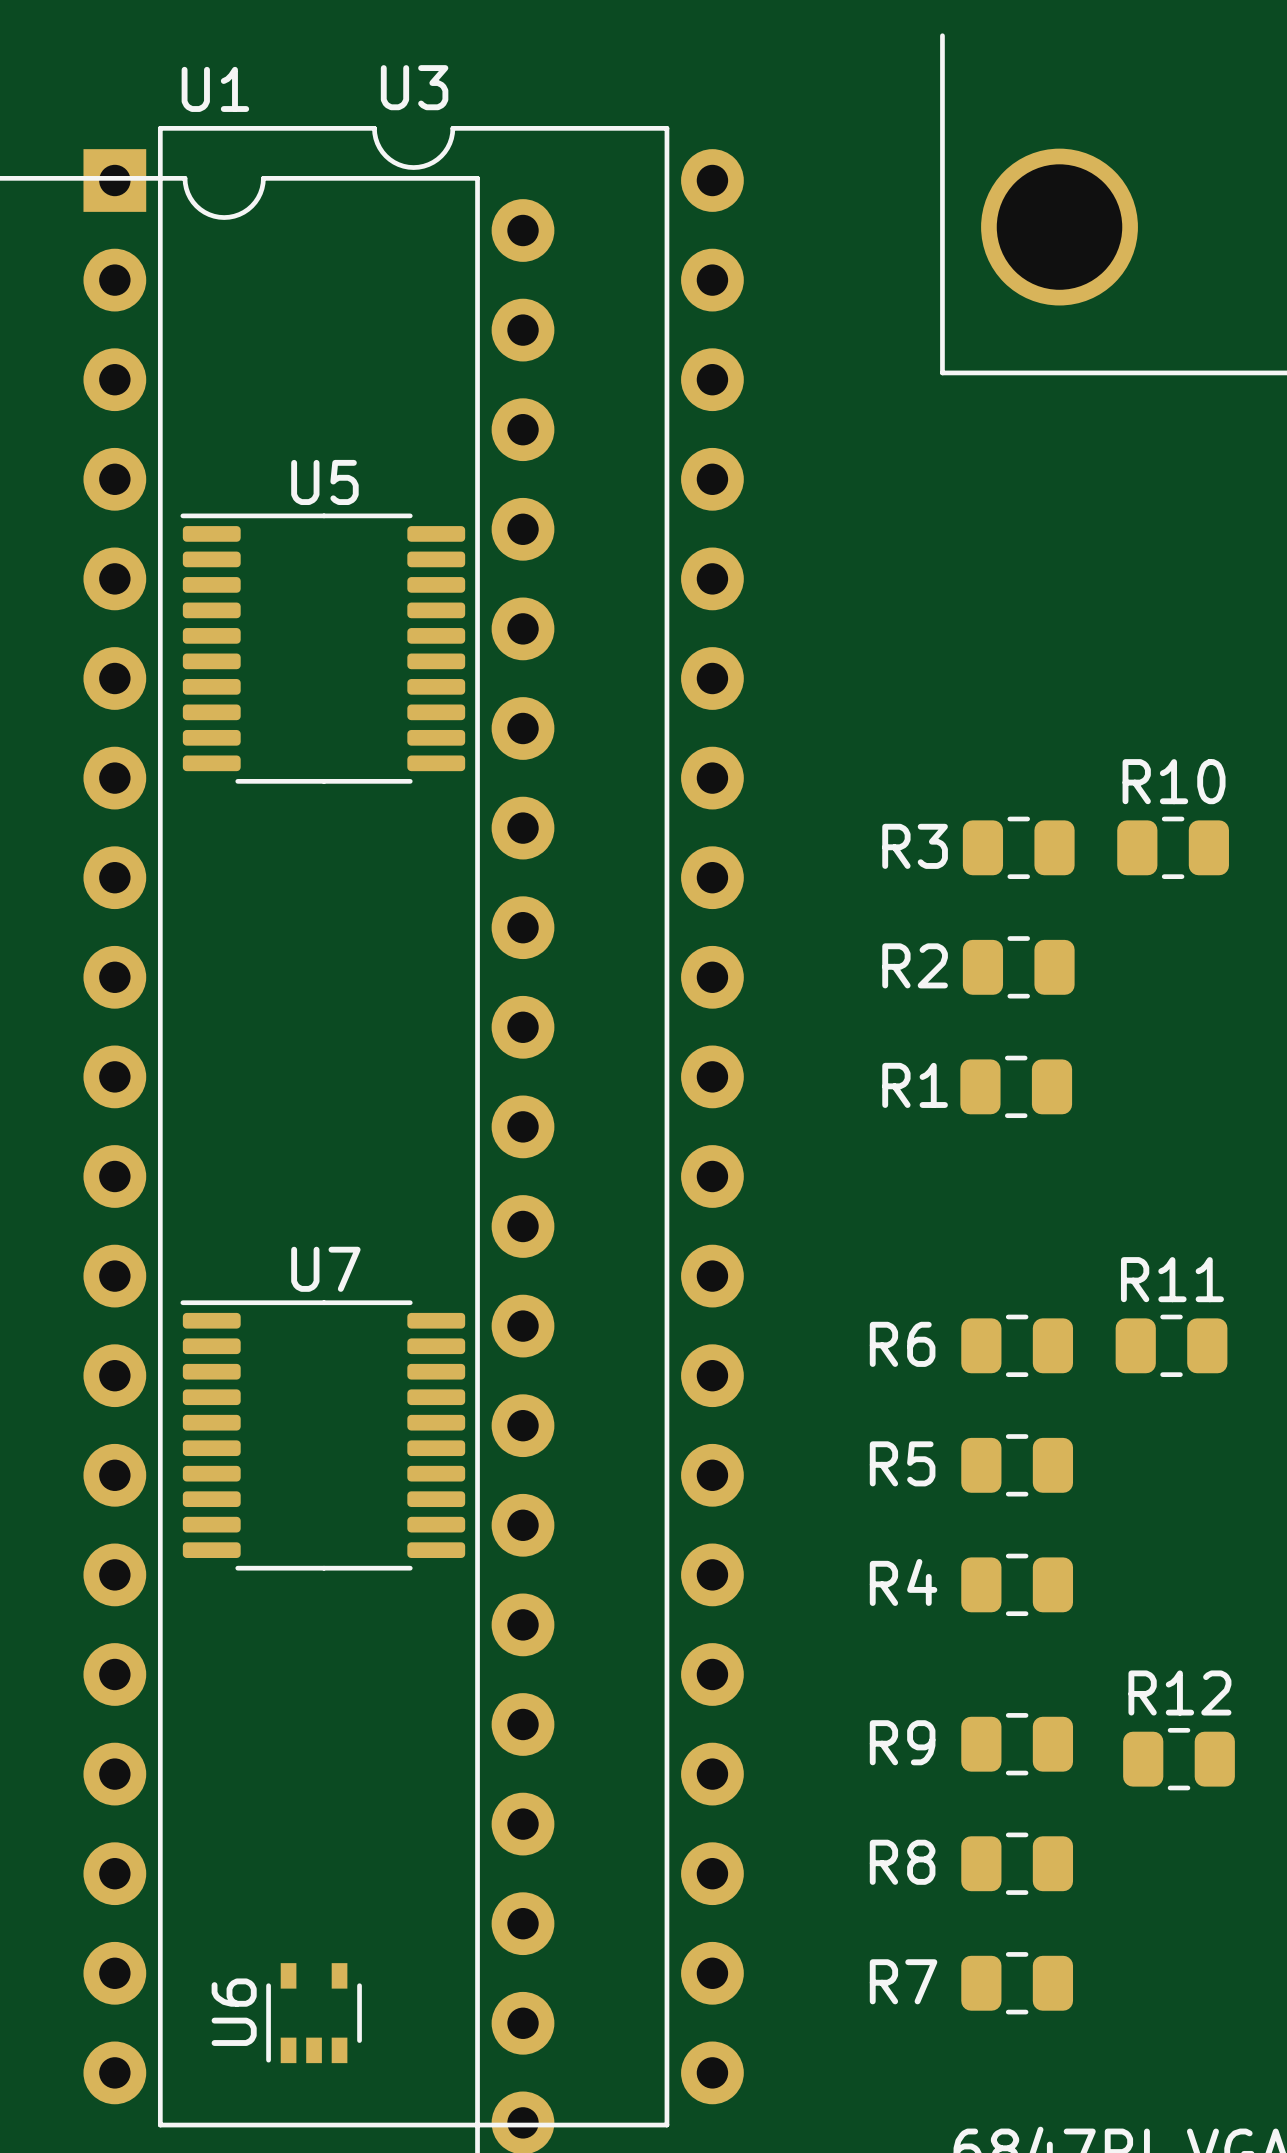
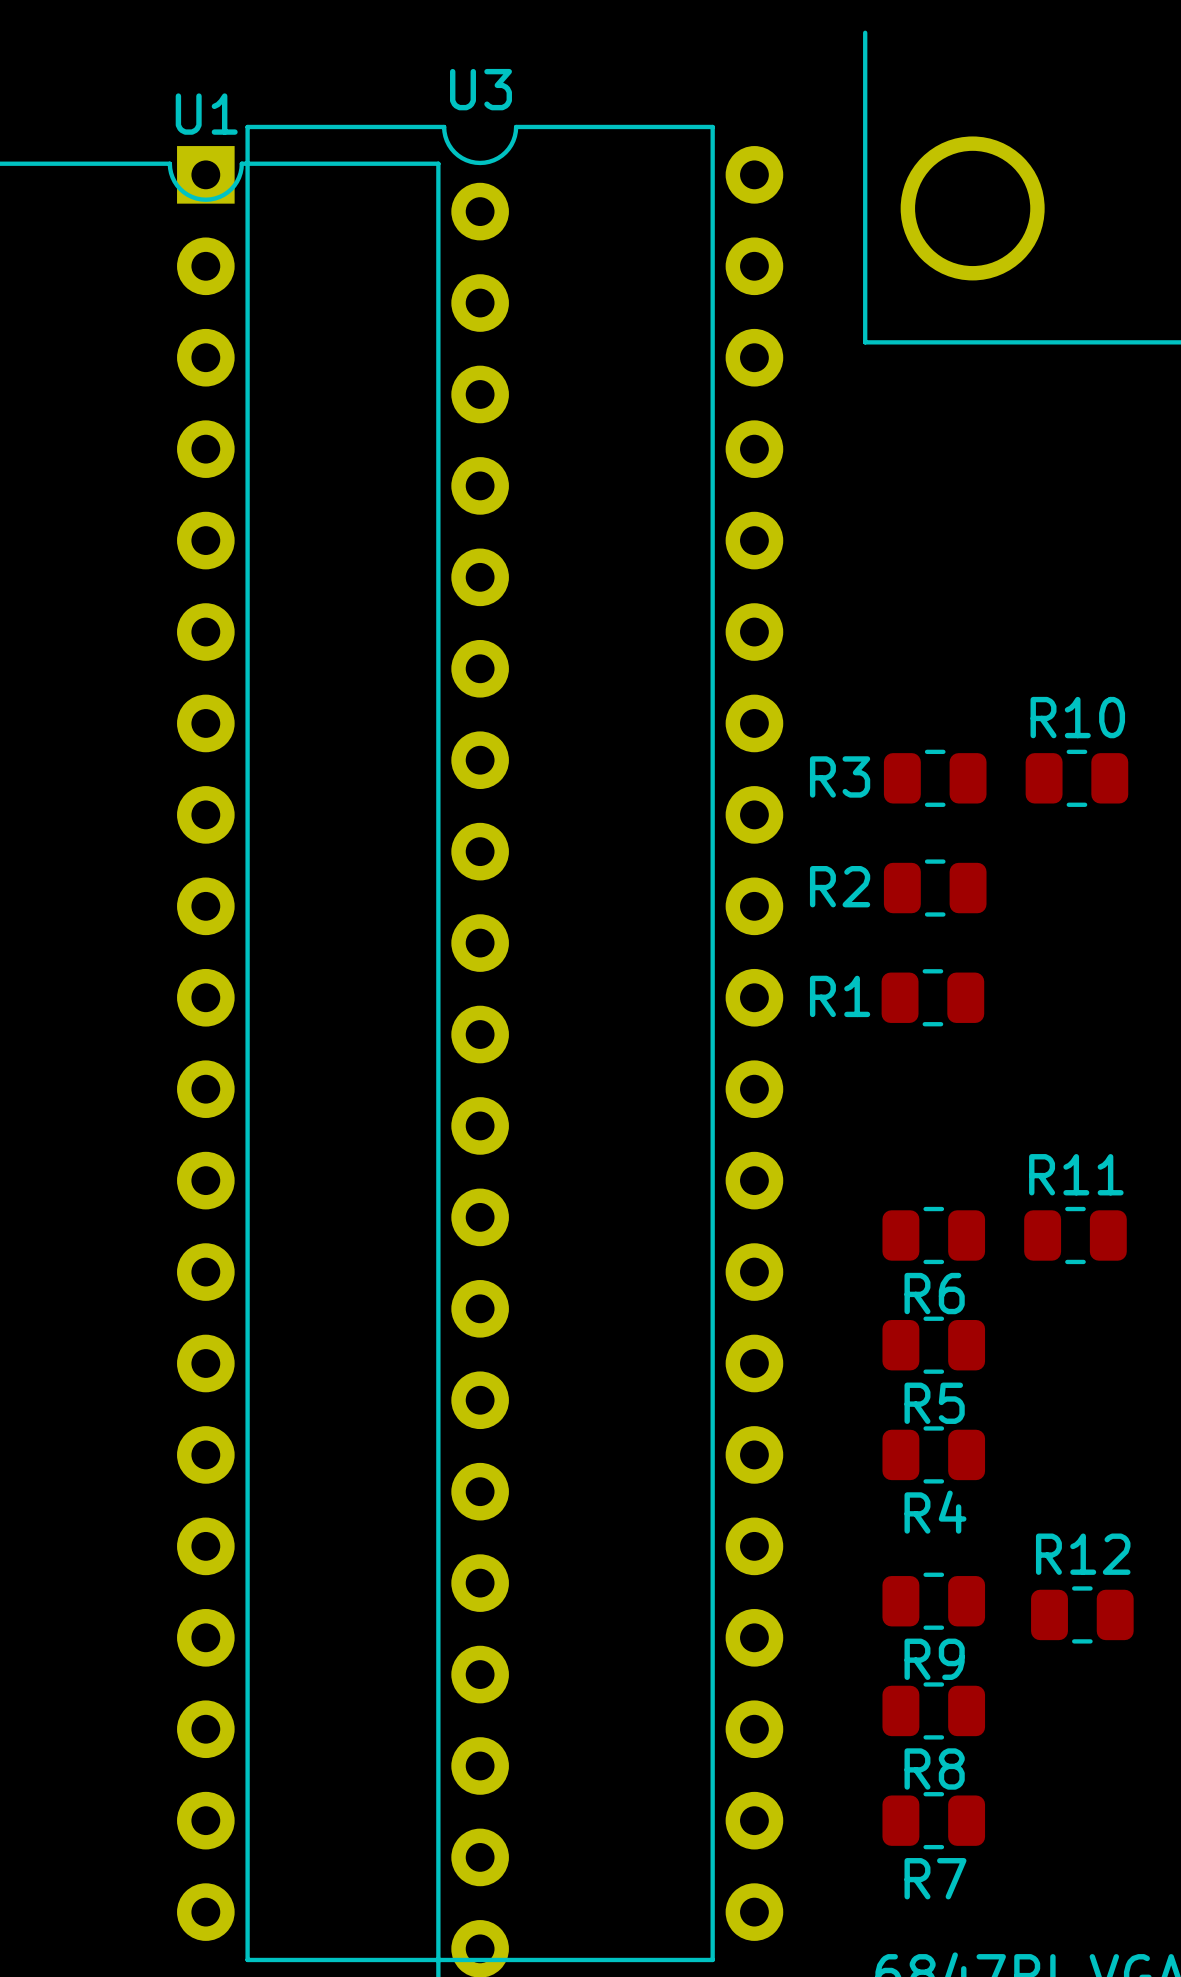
U1 name position: U1 (215, 89) -> U1 (206, 114)
U5: (322, 648) -> none
U3 position: (413, 1126) -> (480, 1043)
R6 name position: R6 (902, 1344) -> R6 (934, 1293)
U7: (322, 1435) -> none
R5 name position: R5 (902, 1463) -> R5 (934, 1403)
R4 name position: R4 (903, 1582) -> R4 (935, 1512)
R9 name position: R9 (902, 1742) -> R9 (934, 1659)
R8 name position: R8 (902, 1862) -> R8 (934, 1769)
R7 name position: R7 (903, 1981) -> R7 (935, 1878)
U6: (314, 2013) -> none

